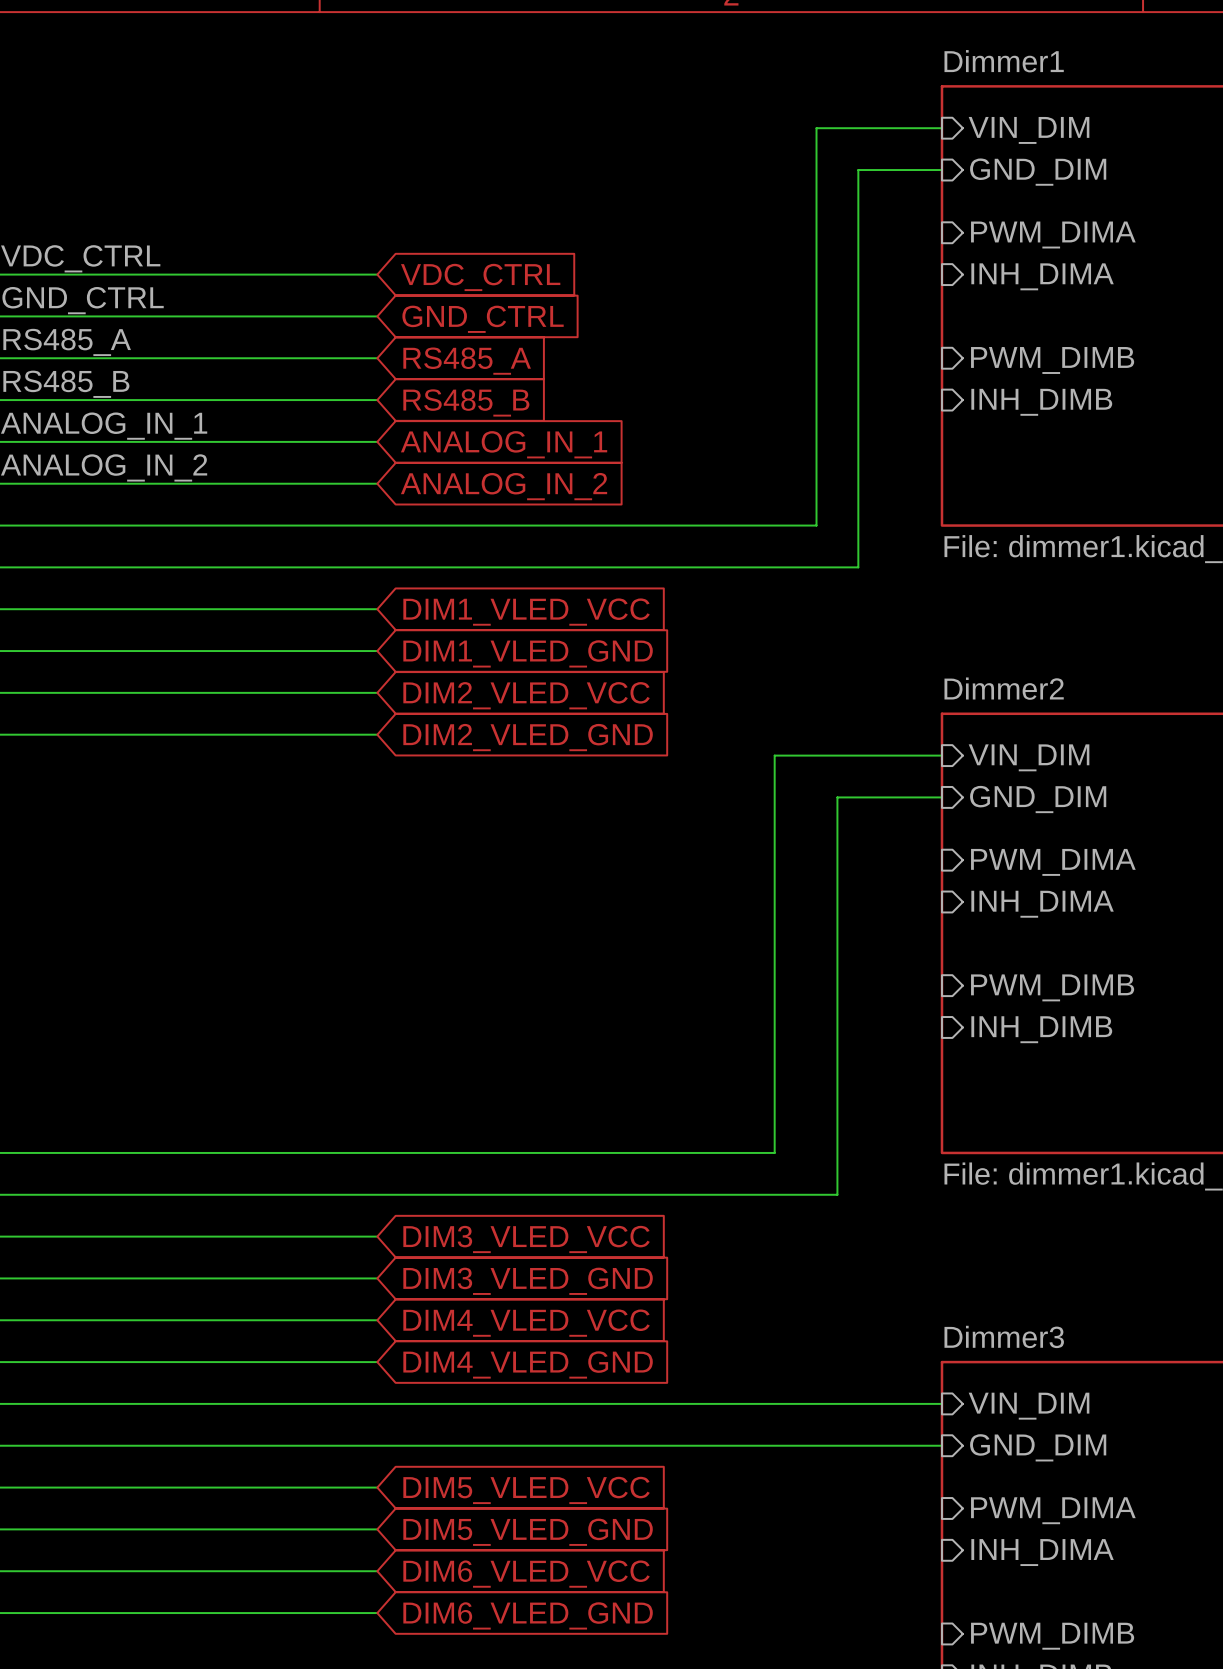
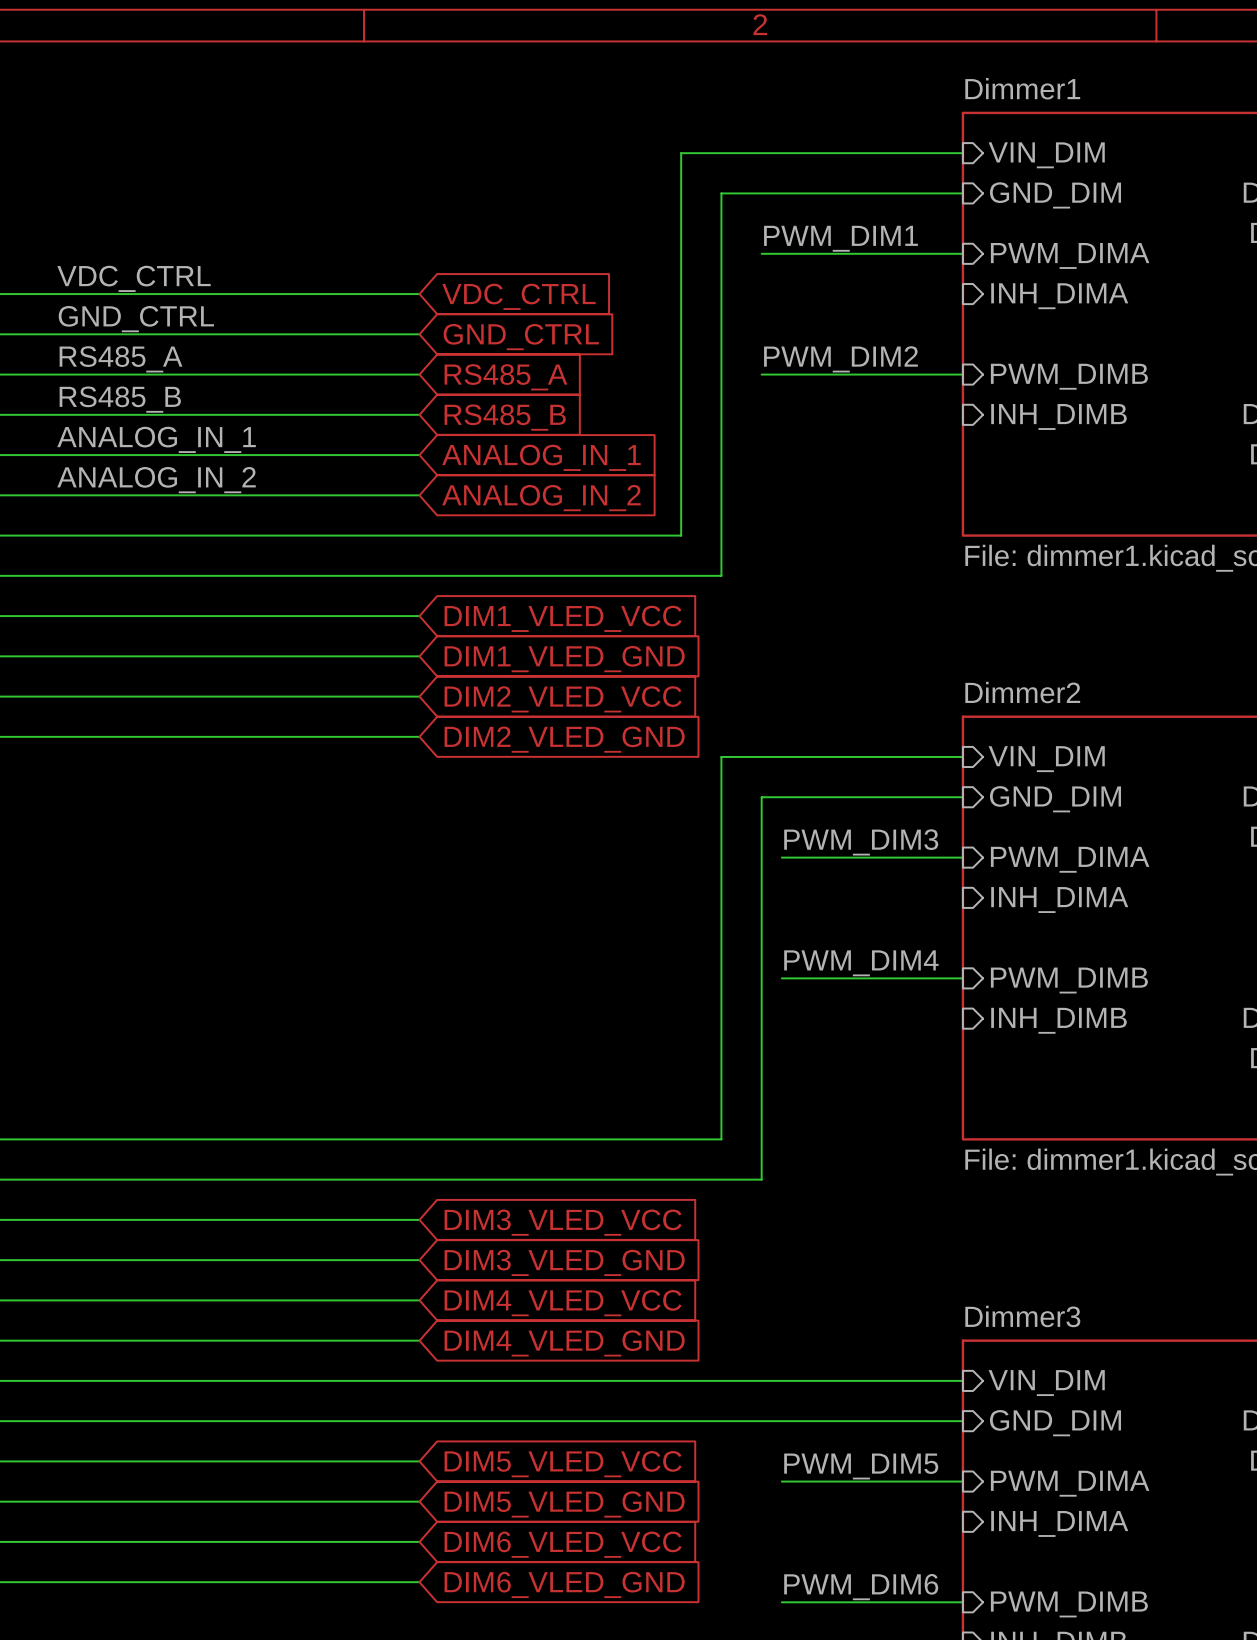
wire: (816, 128) (816, 525) (649, 525) -> (842, 153) (681, 153) (681, 535)
wire: (858, 170) (858, 567) (691, 567) -> (882, 193) (721, 193) (721, 575)
label: none -> PWM_DIM1 (840, 238)
wire: none -> (761, 253) (962, 253)
label: none -> PWM_DIM2 (840, 359)
wire: none -> (761, 374) (962, 374)
wire: (774, 755) (774, 1152) (691, 1152) -> (801, 756) (721, 756) (721, 1139)
wire: (837, 797) (837, 1194) (732, 1194) -> (862, 797) (761, 797) (761, 1179)
label: none -> PWM_DIM3 (861, 842)
wire: none -> (781, 857) (962, 857)
label: none -> PWM_DIM4 (861, 963)
wire: none -> (781, 978) (962, 978)
label: none -> PWM_DIM5 (861, 1466)
wire: none -> (781, 1481) (962, 1481)
label: none -> PWM_DIM6 (861, 1587)
wire: none -> (781, 1602) (962, 1602)

